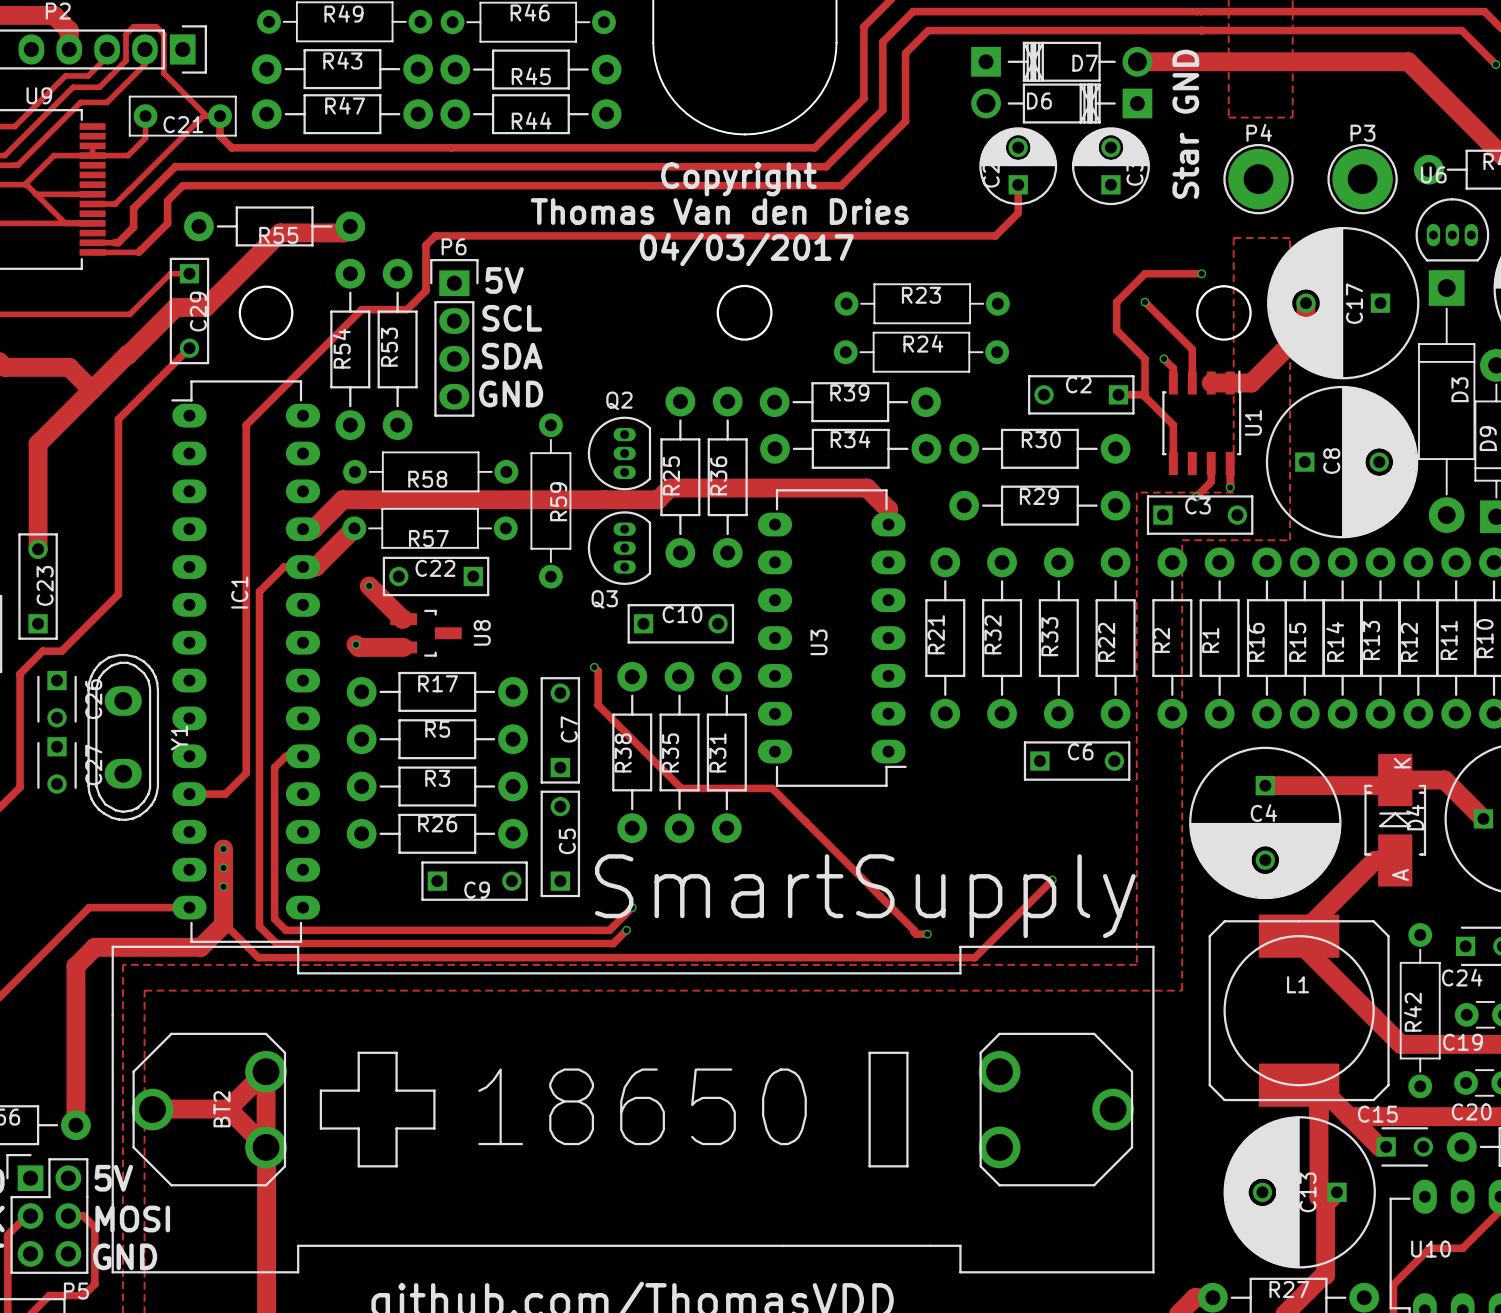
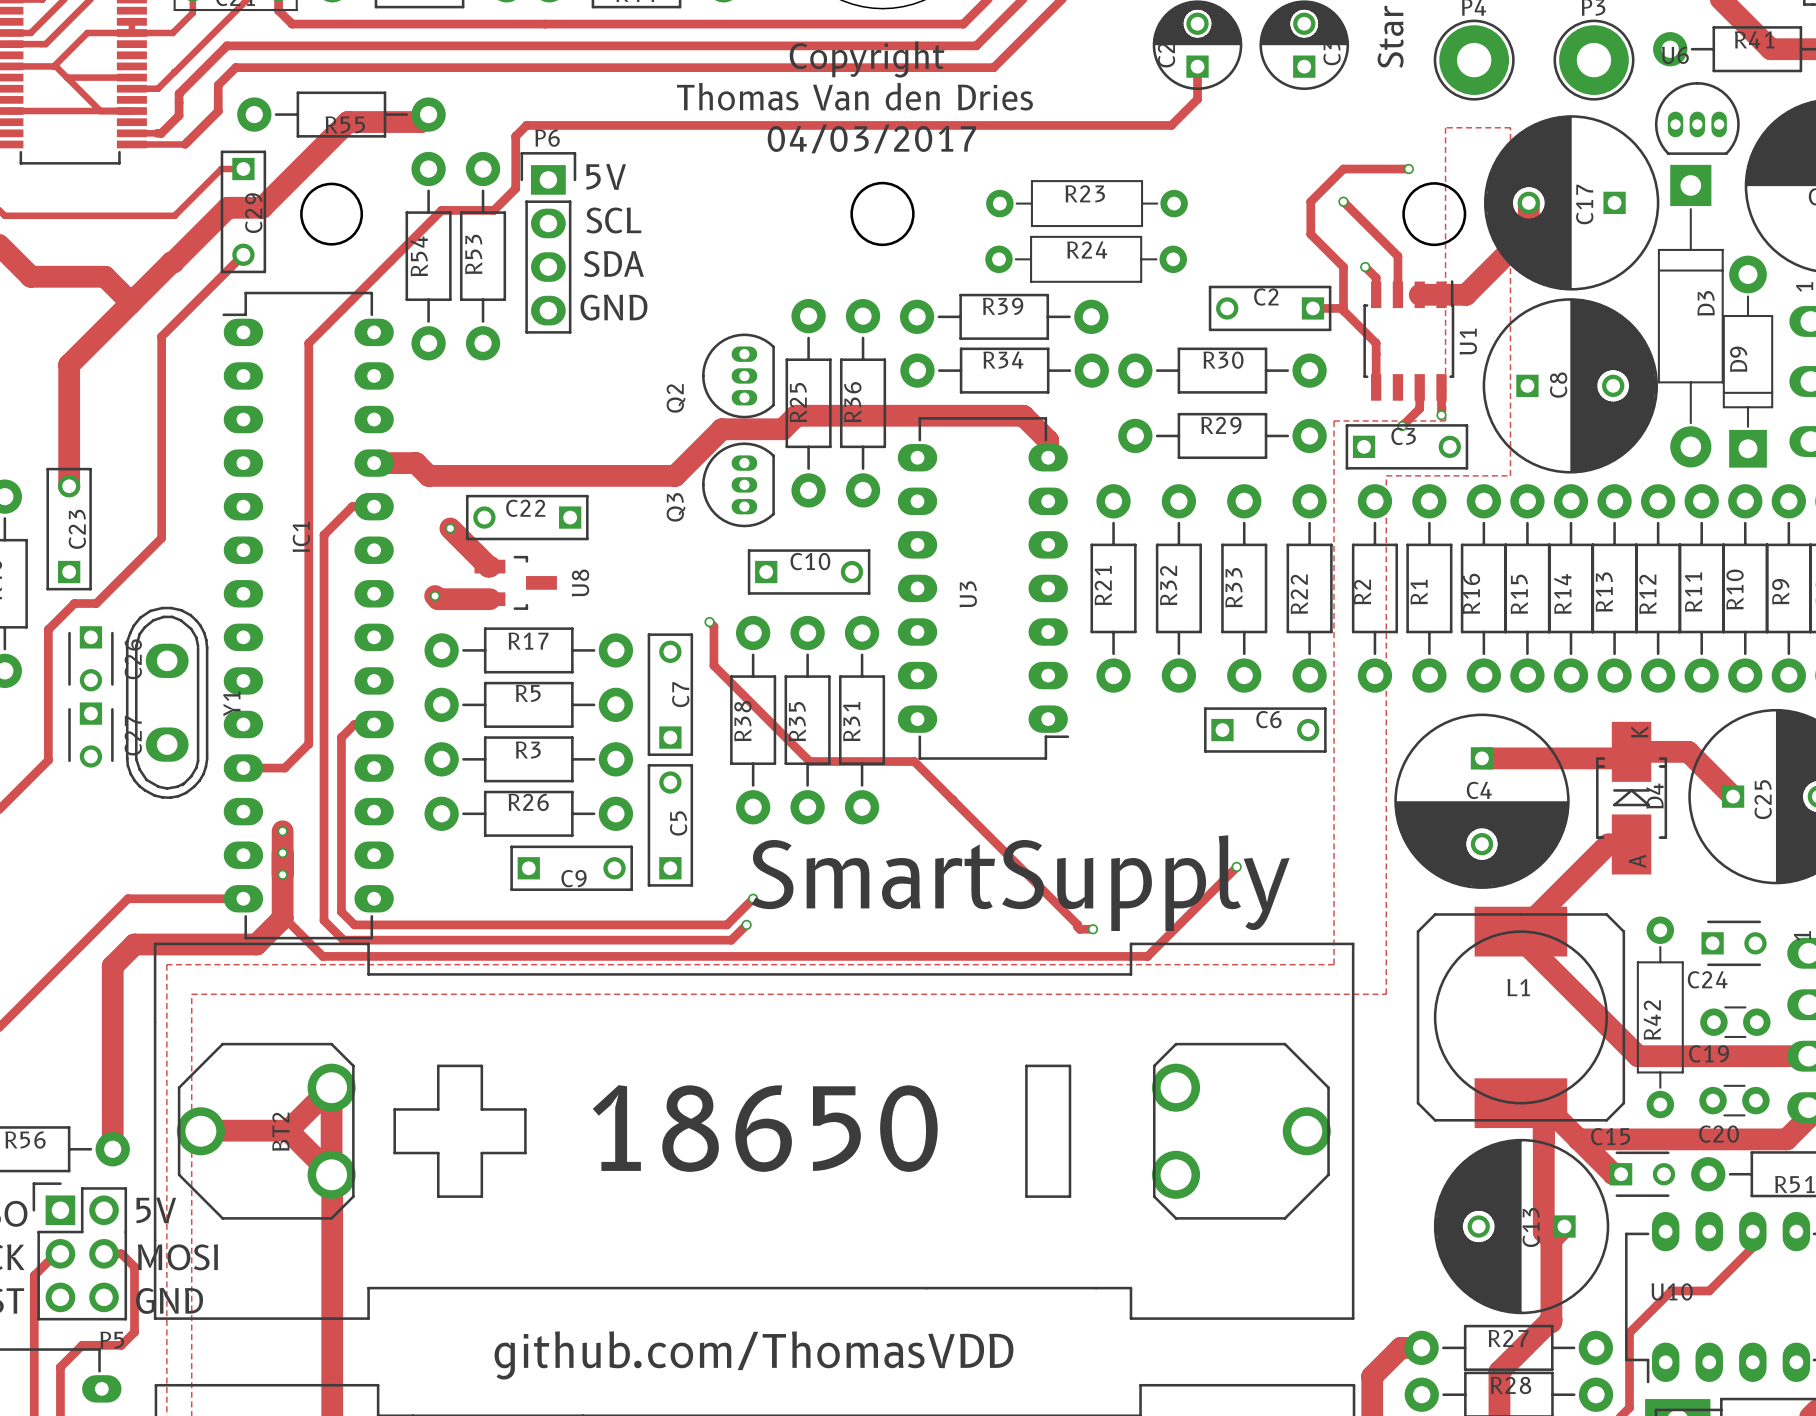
Q2 name rotation: 0° (619, 400) -> 90° counterclockwise (676, 398)
Q2 name position: Q2 (619, 400) -> Q2 (676, 398)
R58: (430, 471) -> none
track: (605, 499) (342, 499) (313, 529) -> (721, 429) (675, 475) (428, 475) (415, 463) (386, 463)
R59: (550, 500) -> none
track: (354, 528) (315, 567) (303, 567) -> none
R57: (430, 528) -> none
Q3 name rotation: 0° (604, 599) -> 90° counterclockwise (676, 507)
Q3 name position: Q3 (604, 599) -> Q3 (676, 507)

